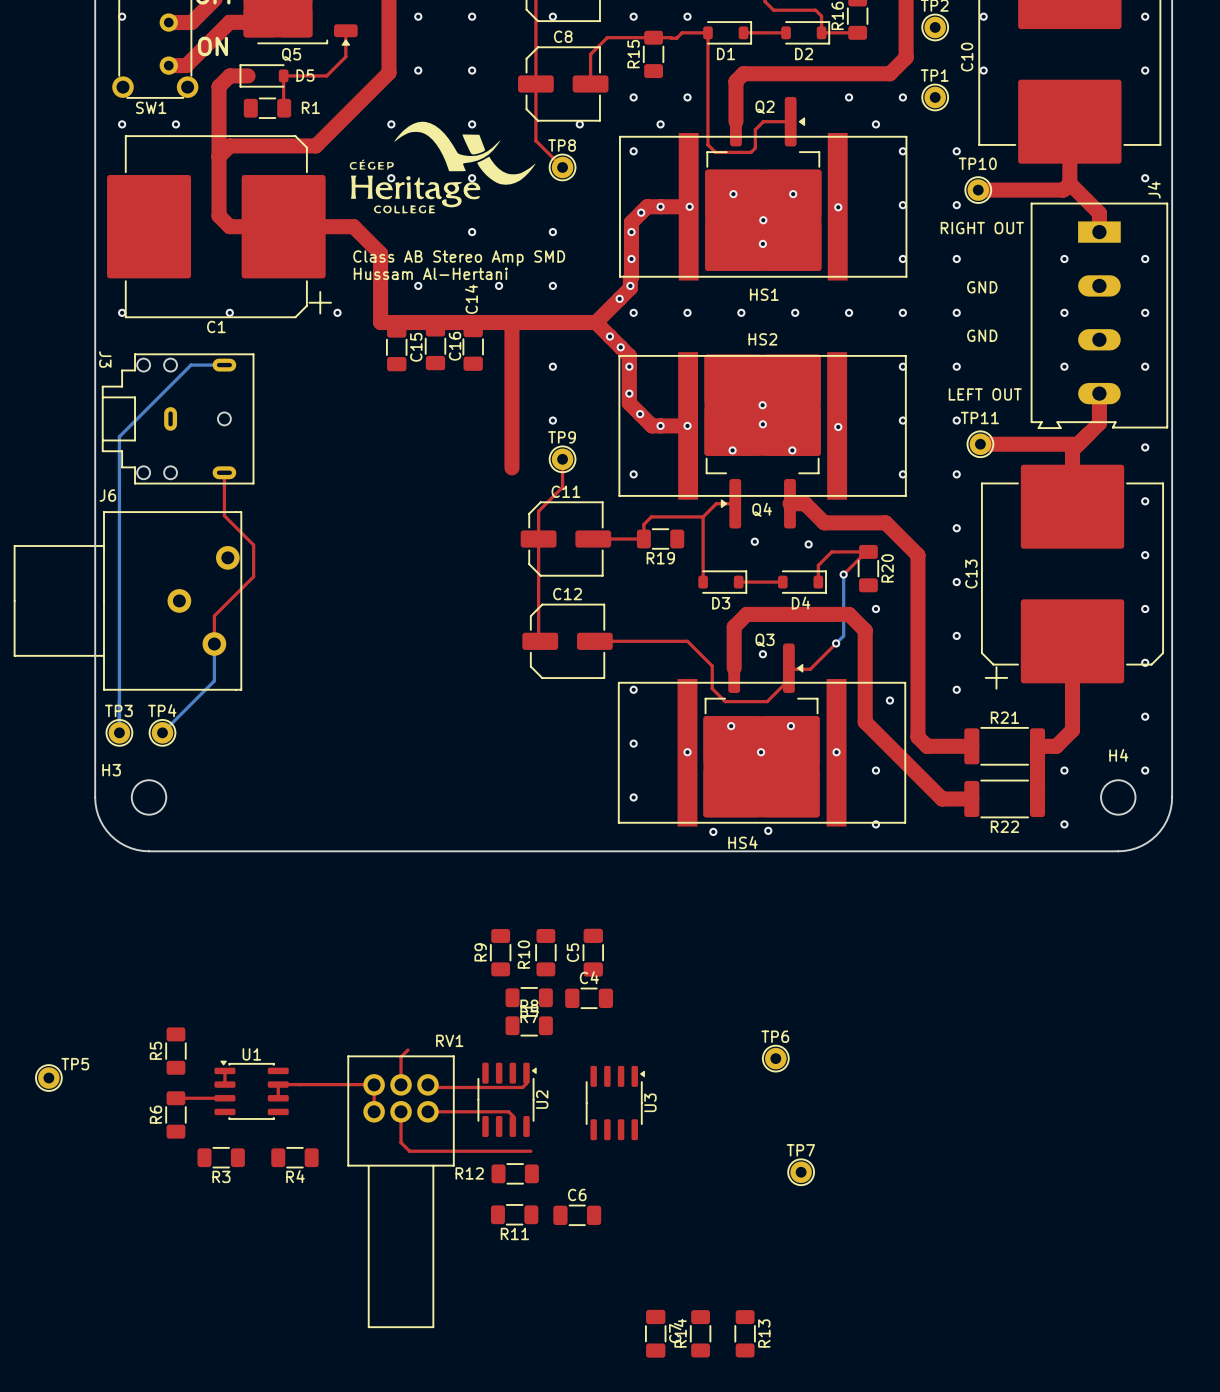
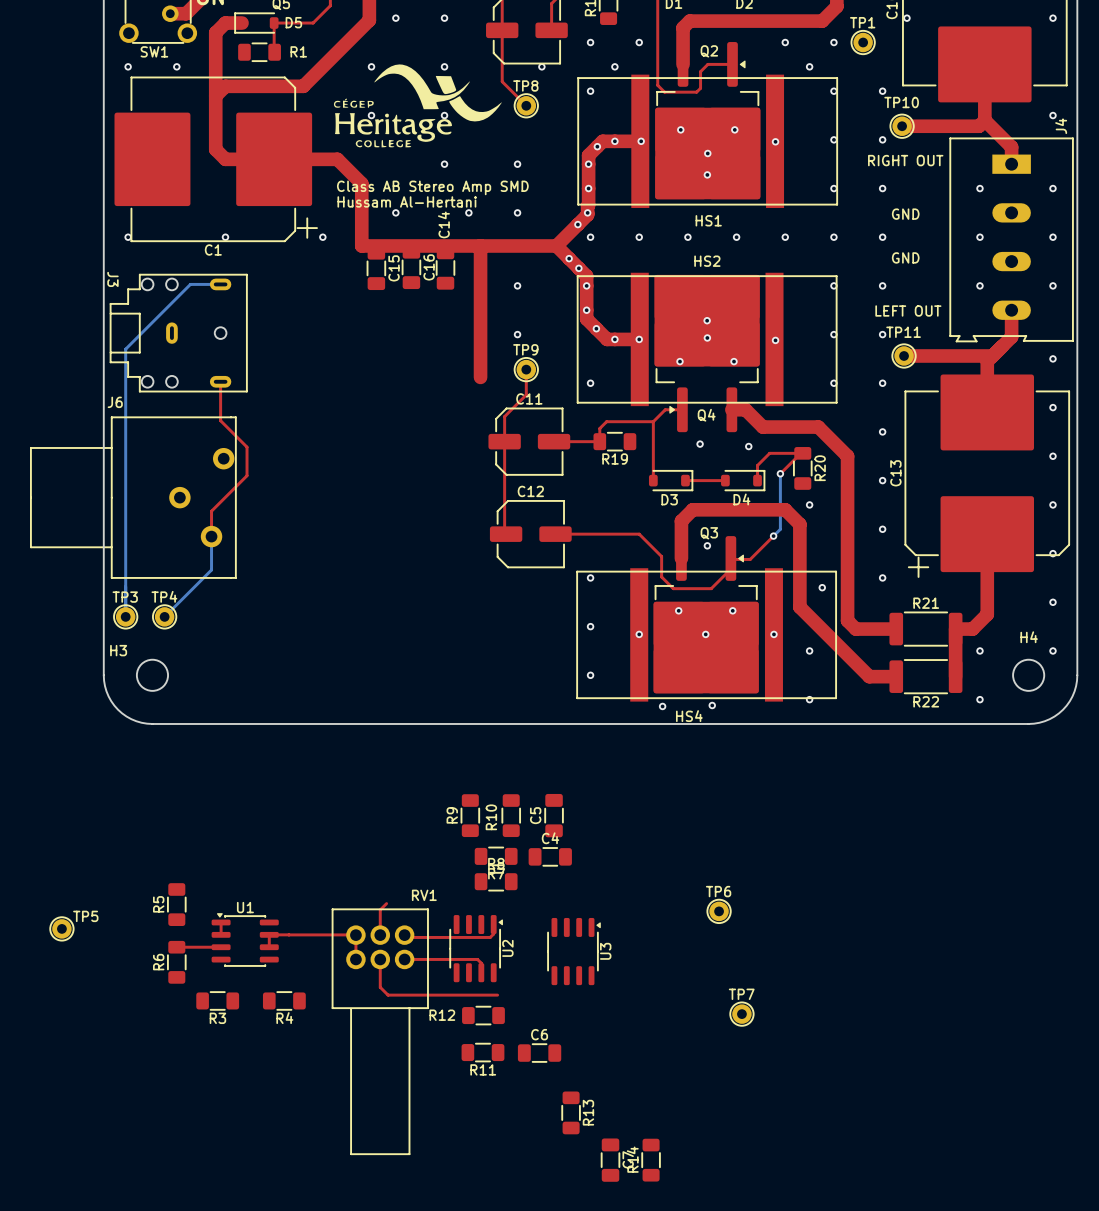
R13 position: (745, 1333) -> (571, 1112)

